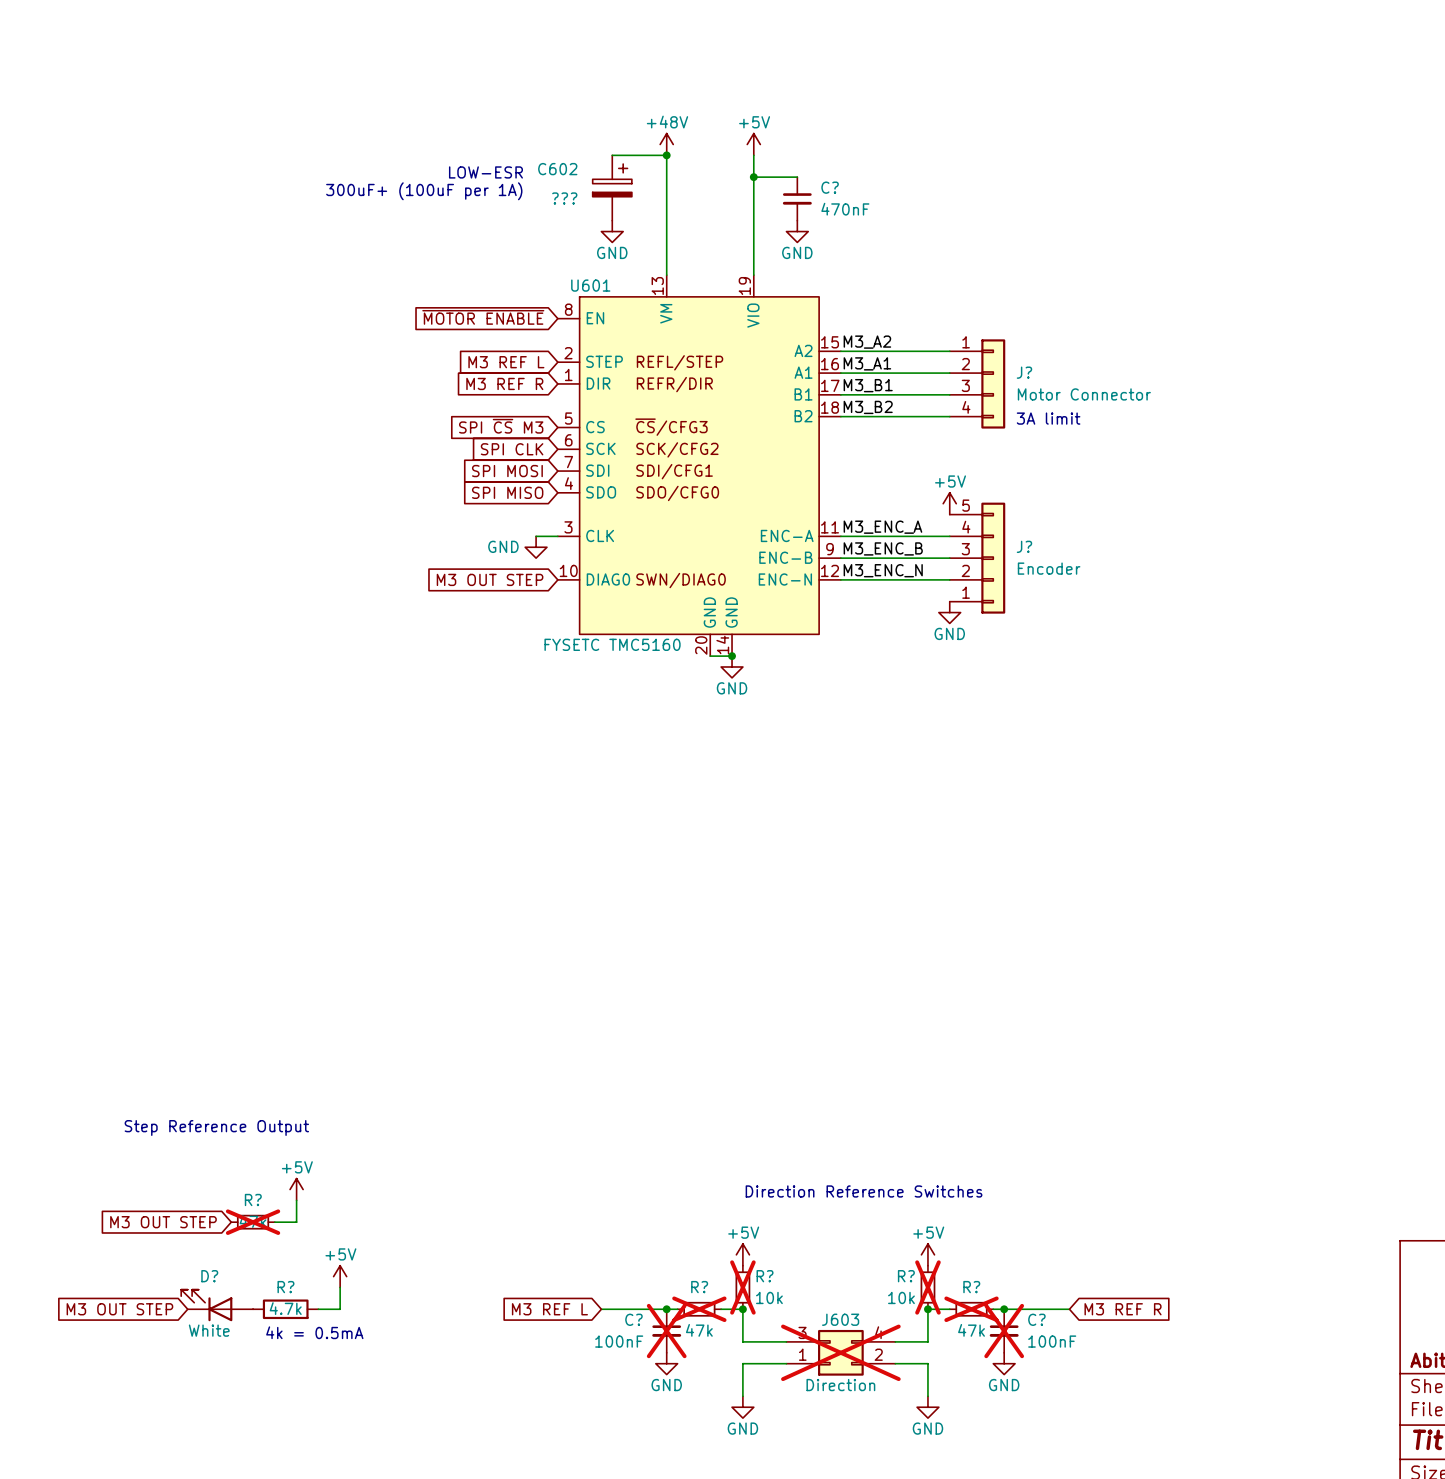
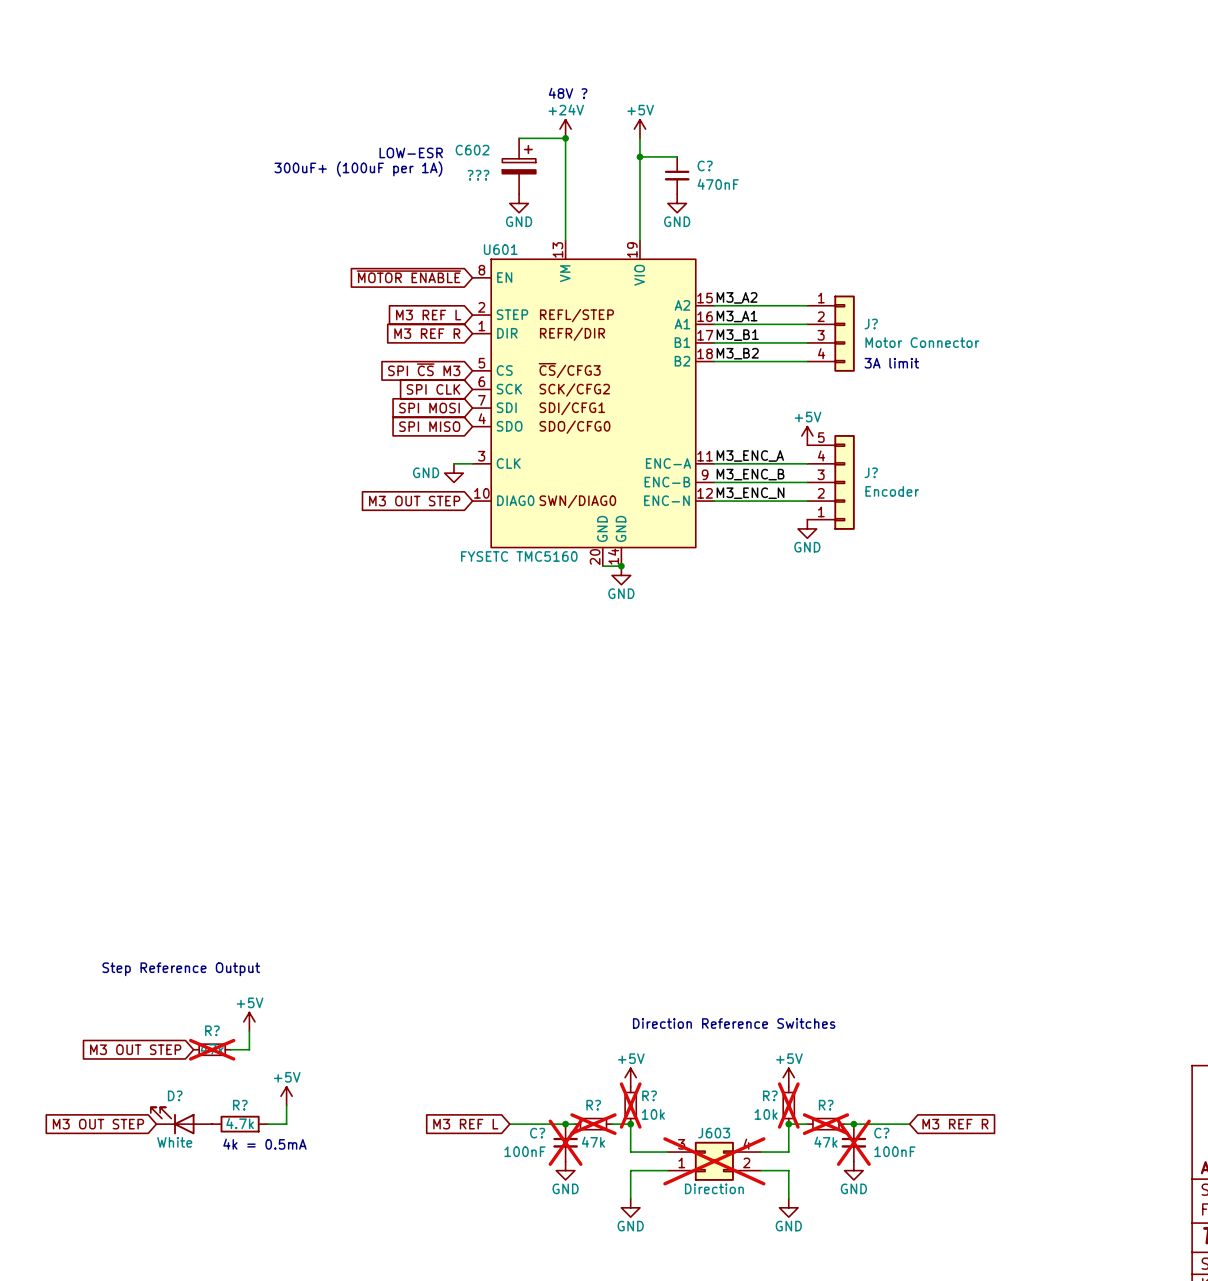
text: none -> 48V ? (568, 93)
power symbol: +48V (666, 144) -> +24V (565, 129)

